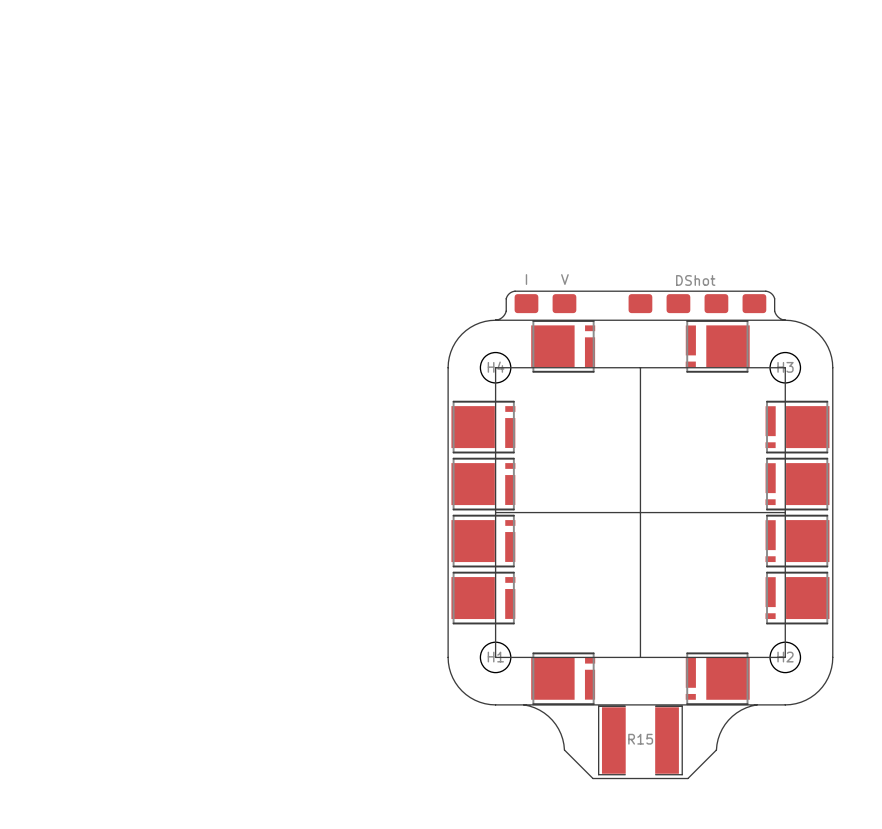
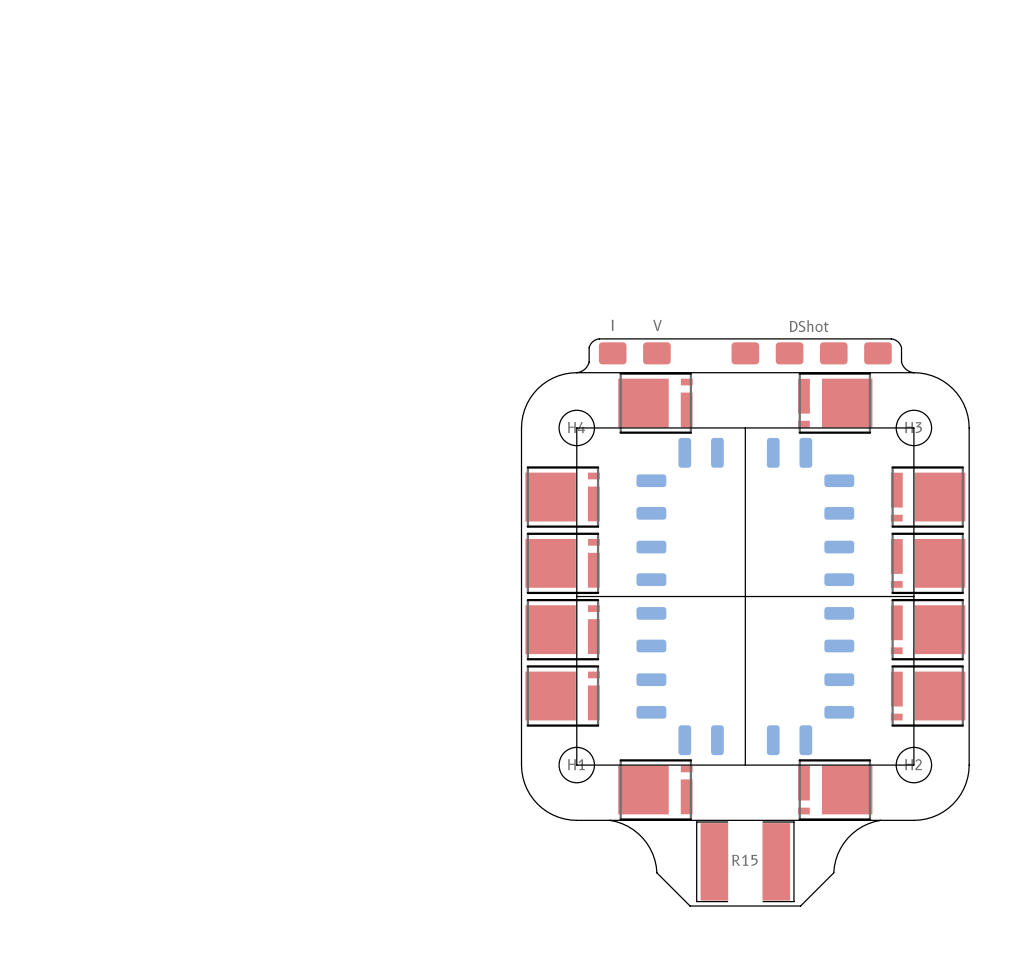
part: none -> (701, 452)
part: none -> (789, 452)
part: none -> (651, 497)
part: none -> (839, 497)
part: none -> (651, 563)
part: none -> (839, 563)
part: none -> (651, 629)
part: none -> (839, 629)
part: none -> (651, 696)
part: none -> (839, 696)
part: none -> (701, 740)
part: none -> (789, 740)

